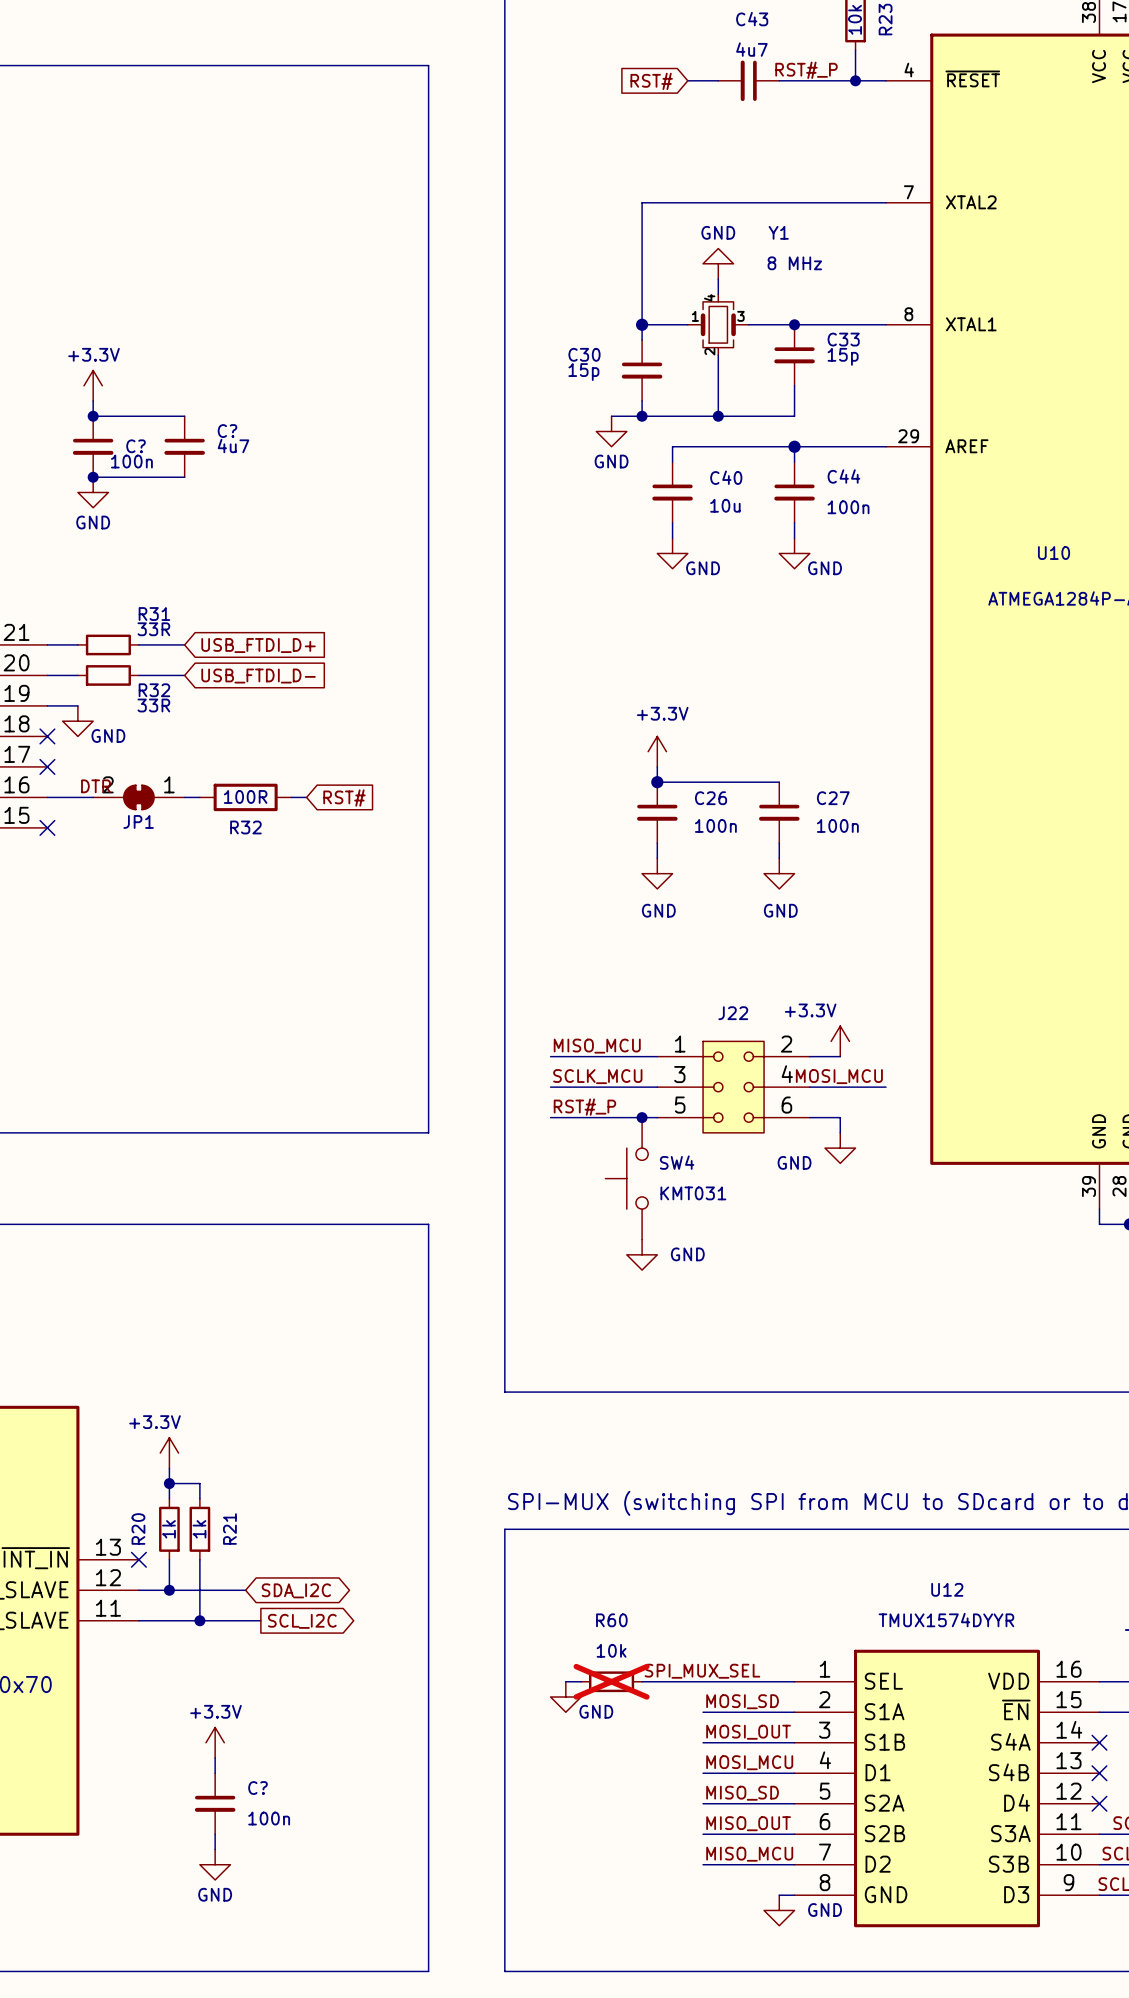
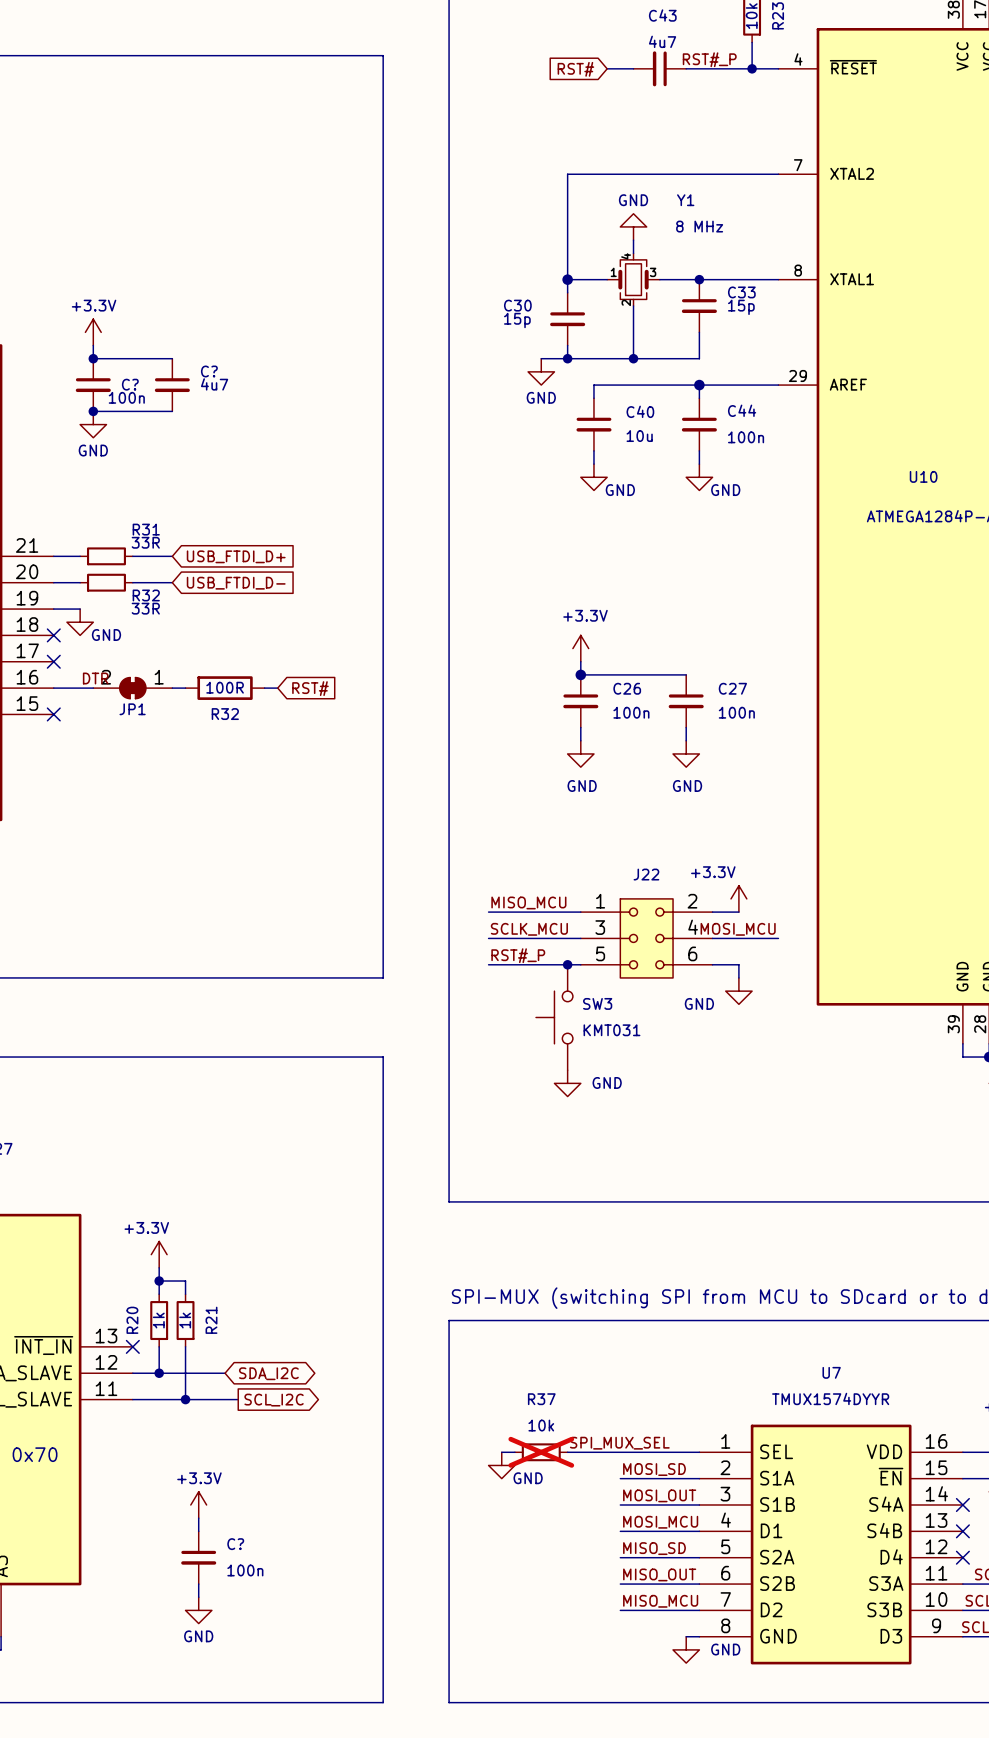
SW4 name: SW4 (677, 1162) -> SW3 (597, 1003)
U12 name: U12 (947, 1589) -> U7 (831, 1372)
R60 name: R60 (611, 1620) -> R37 (541, 1399)

